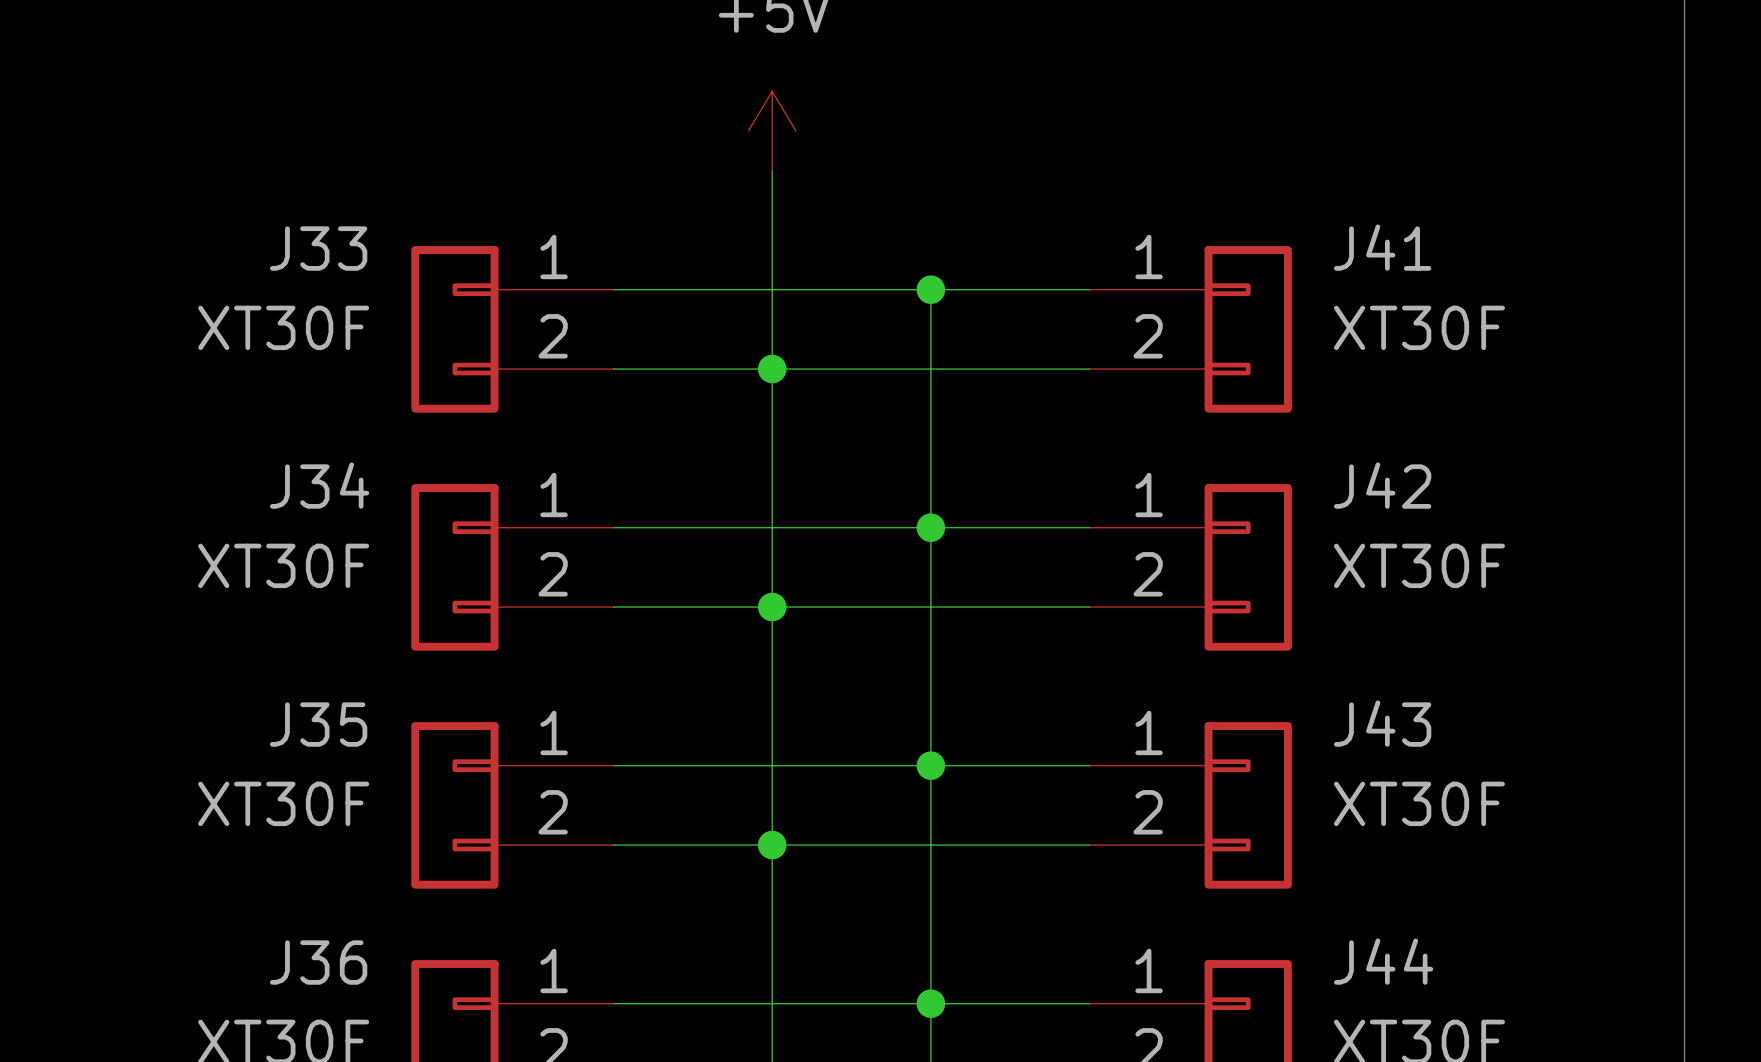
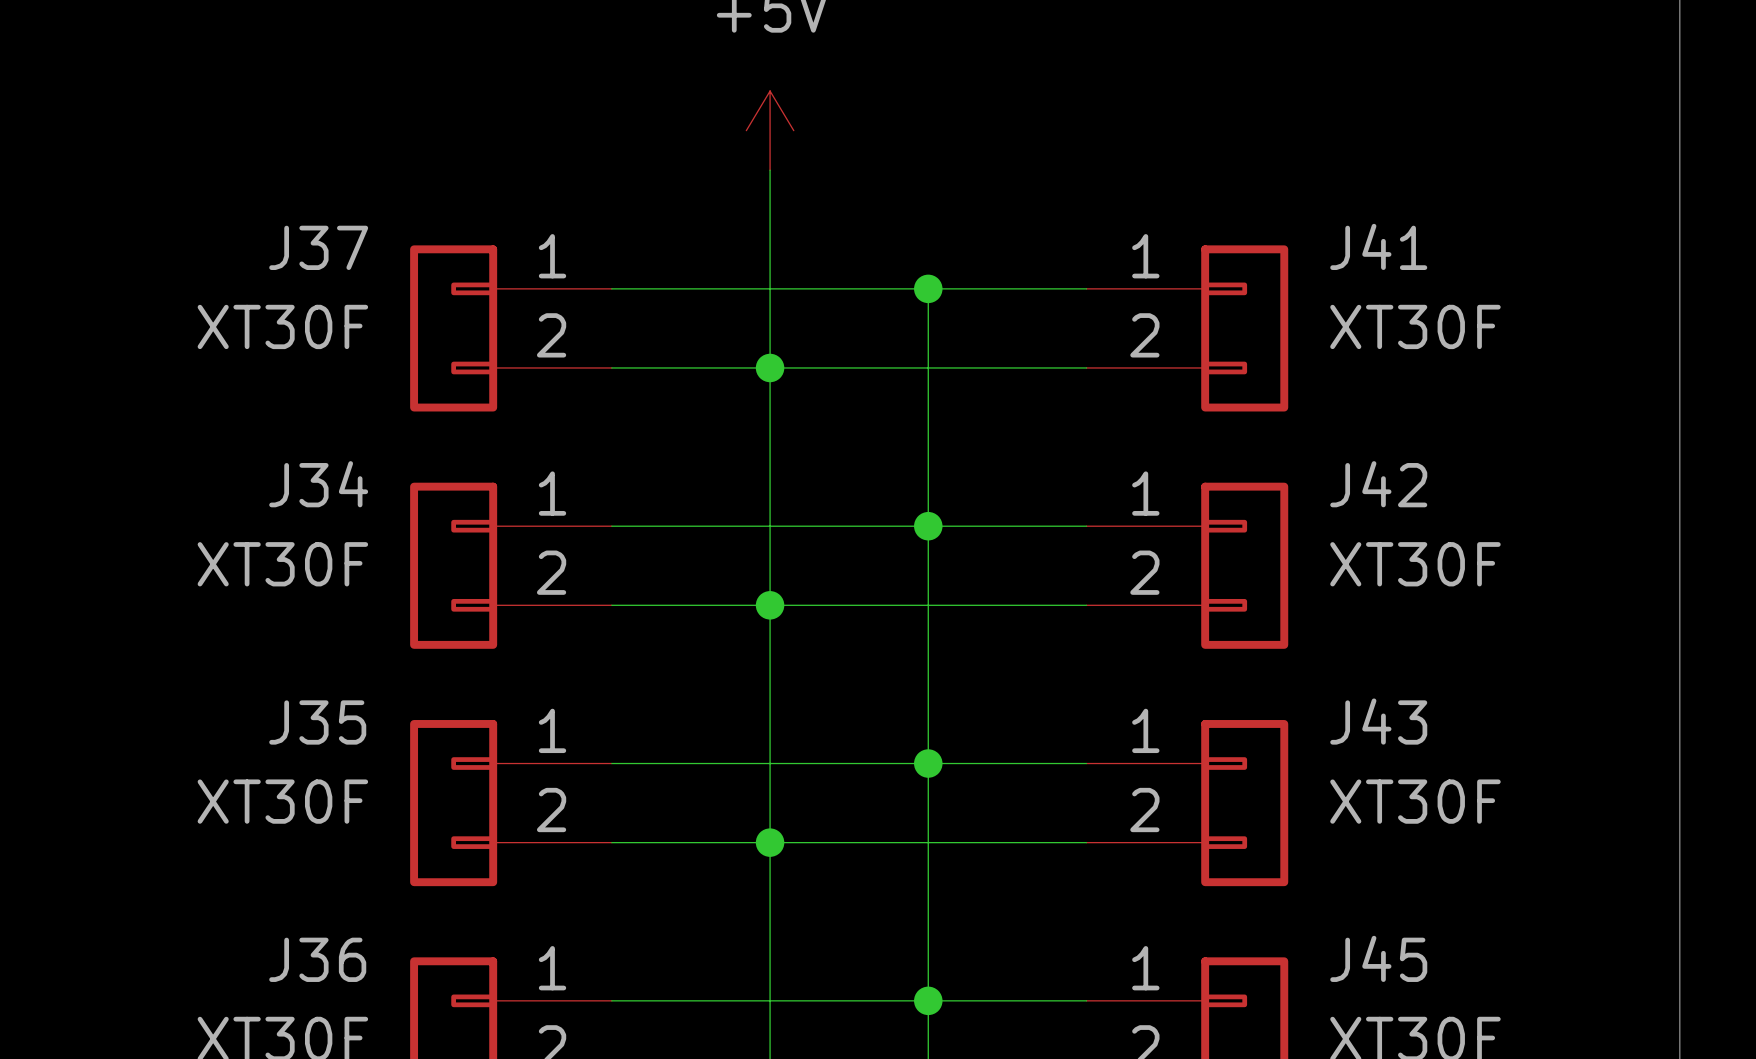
J33 name: J33 (318, 248) -> J37 (318, 247)
J44 name: J44 (1383, 961) -> J45 (1378, 958)

